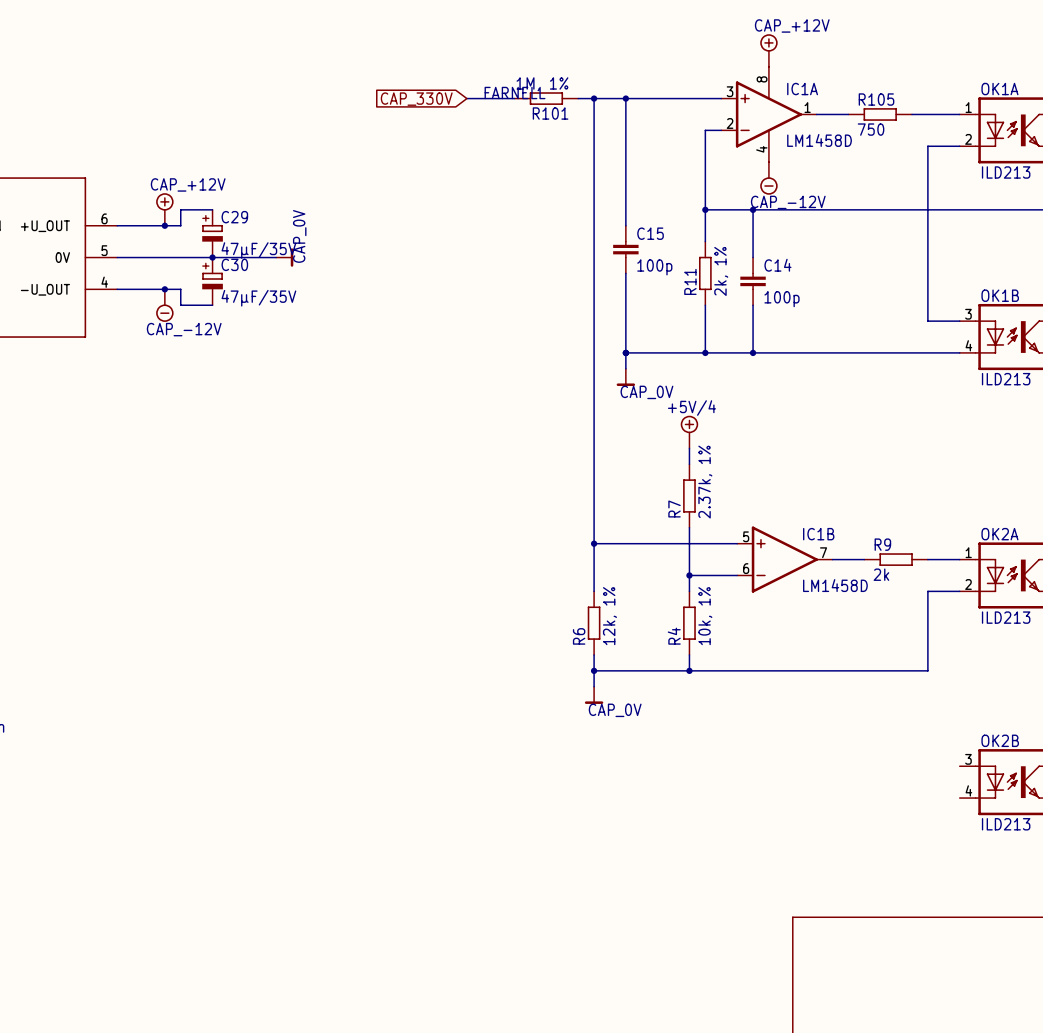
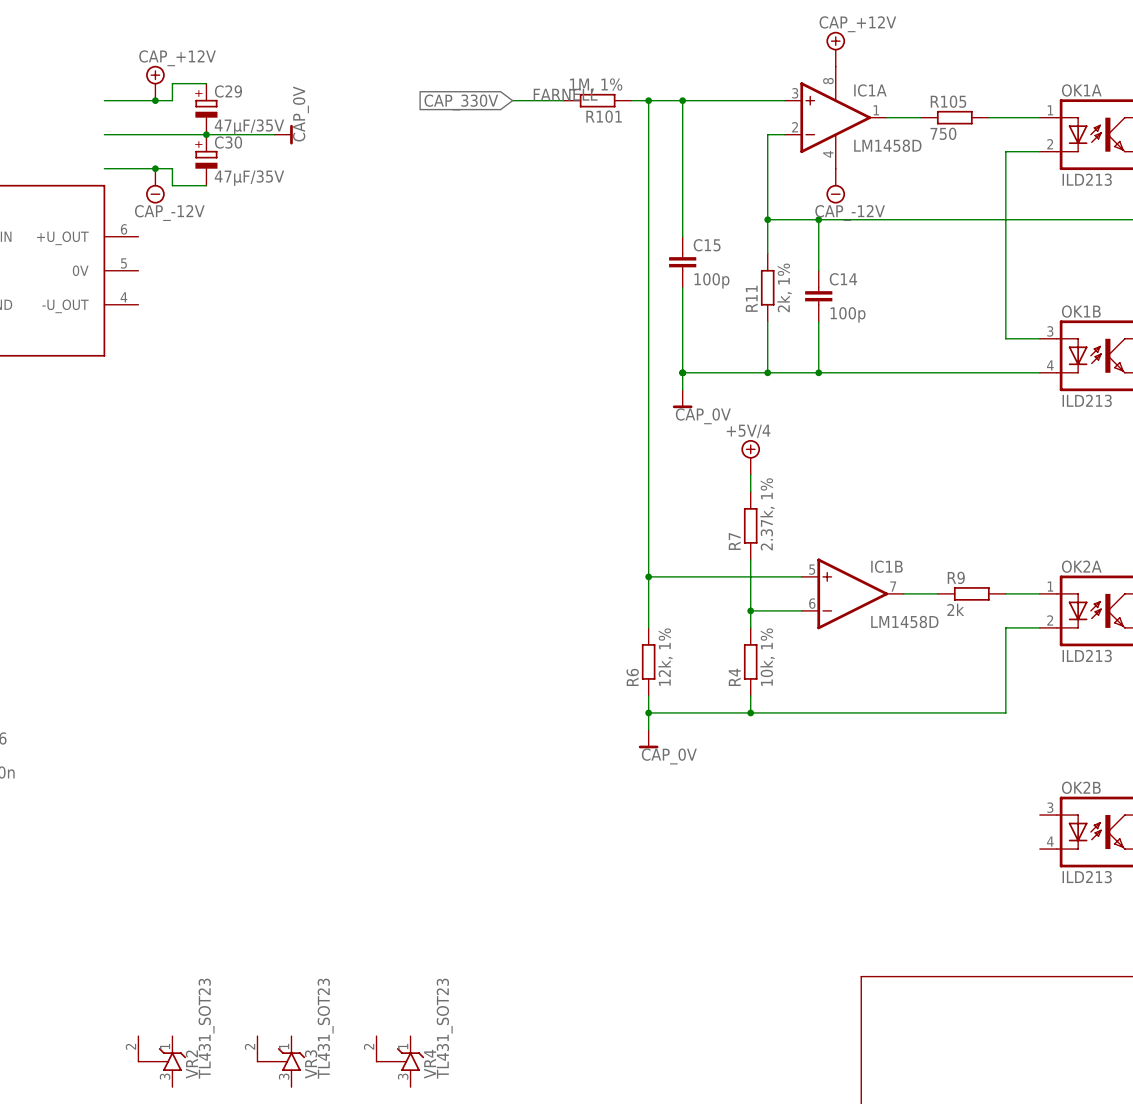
junction: none -> (155, 100)
junction: none -> (206, 134)
junction: none -> (155, 168)
power symbol position: CAP_+12V (164, 209) -> CAP_+12V (155, 83)
wire: (212, 209) (180, 209) (180, 225) (117, 225) -> (206, 83) (172, 83) (172, 100) (104, 100)
junction: (164, 225) -> none
C29 position: (212, 233) -> (206, 109)
wire: (117, 257) (276, 257) -> (104, 134) (274, 134)
junction: (212, 257) -> none
power symbol position: CAP_0V (284, 257) -> CAP_0V (283, 134)
C30 position: (212, 281) -> (206, 160)
wire: (117, 289) (180, 289) (180, 305) (212, 305) -> (104, 168) (172, 168) (172, 185) (206, 185)
junction: (164, 289) -> none
power symbol position: CAP_-12V (164, 305) -> CAP_-12V (155, 186)
VR2: none -> TL431_SOT23 (161, 1061)
VR3: none -> TL431_SOT23 (281, 1061)
VR4: none -> TL431_SOT23 (400, 1061)

